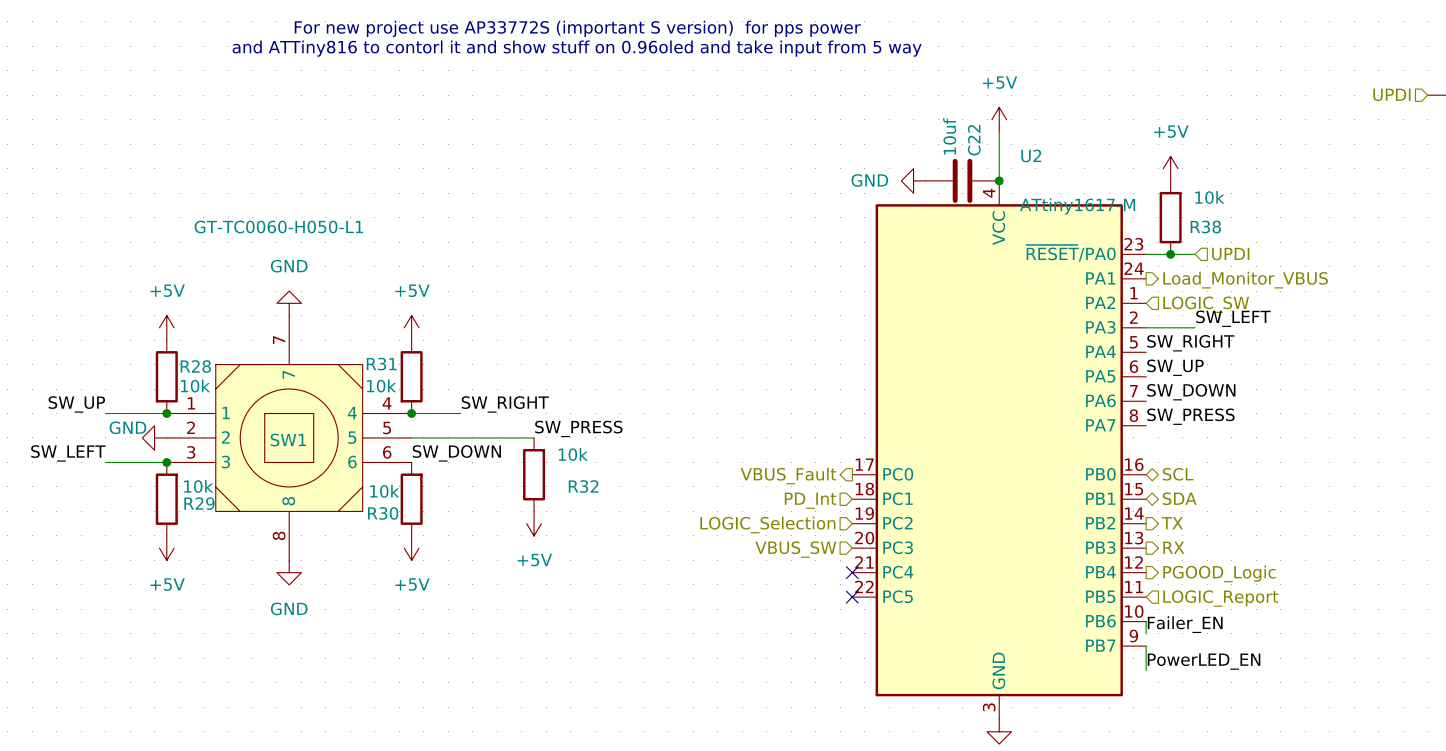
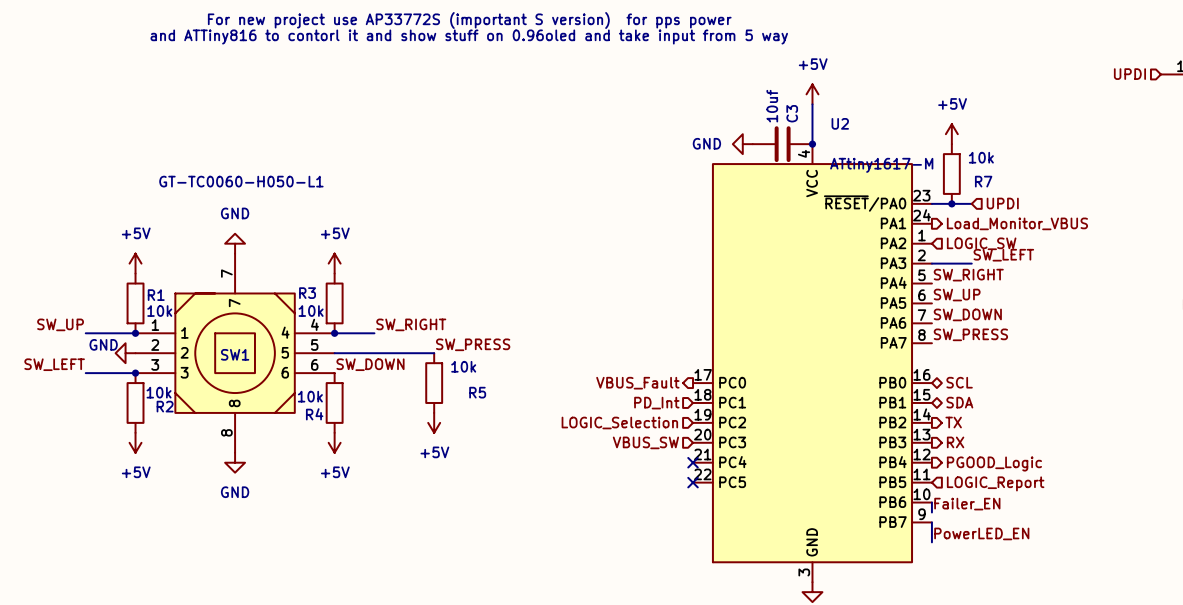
C22 name: C22 (974, 140) -> C3 (792, 113)
R38 name: R38 (1205, 226) -> R7 (983, 181)
R31 name: R31 (381, 364) -> R3 (307, 293)
R28 name: R28 (195, 366) -> R1 (156, 295)
R32 name: R32 (583, 486) -> R5 (477, 392)
R29 name: R29 (199, 503) -> R2 (165, 406)
R30 name: R30 (383, 513) -> R4 (314, 414)

